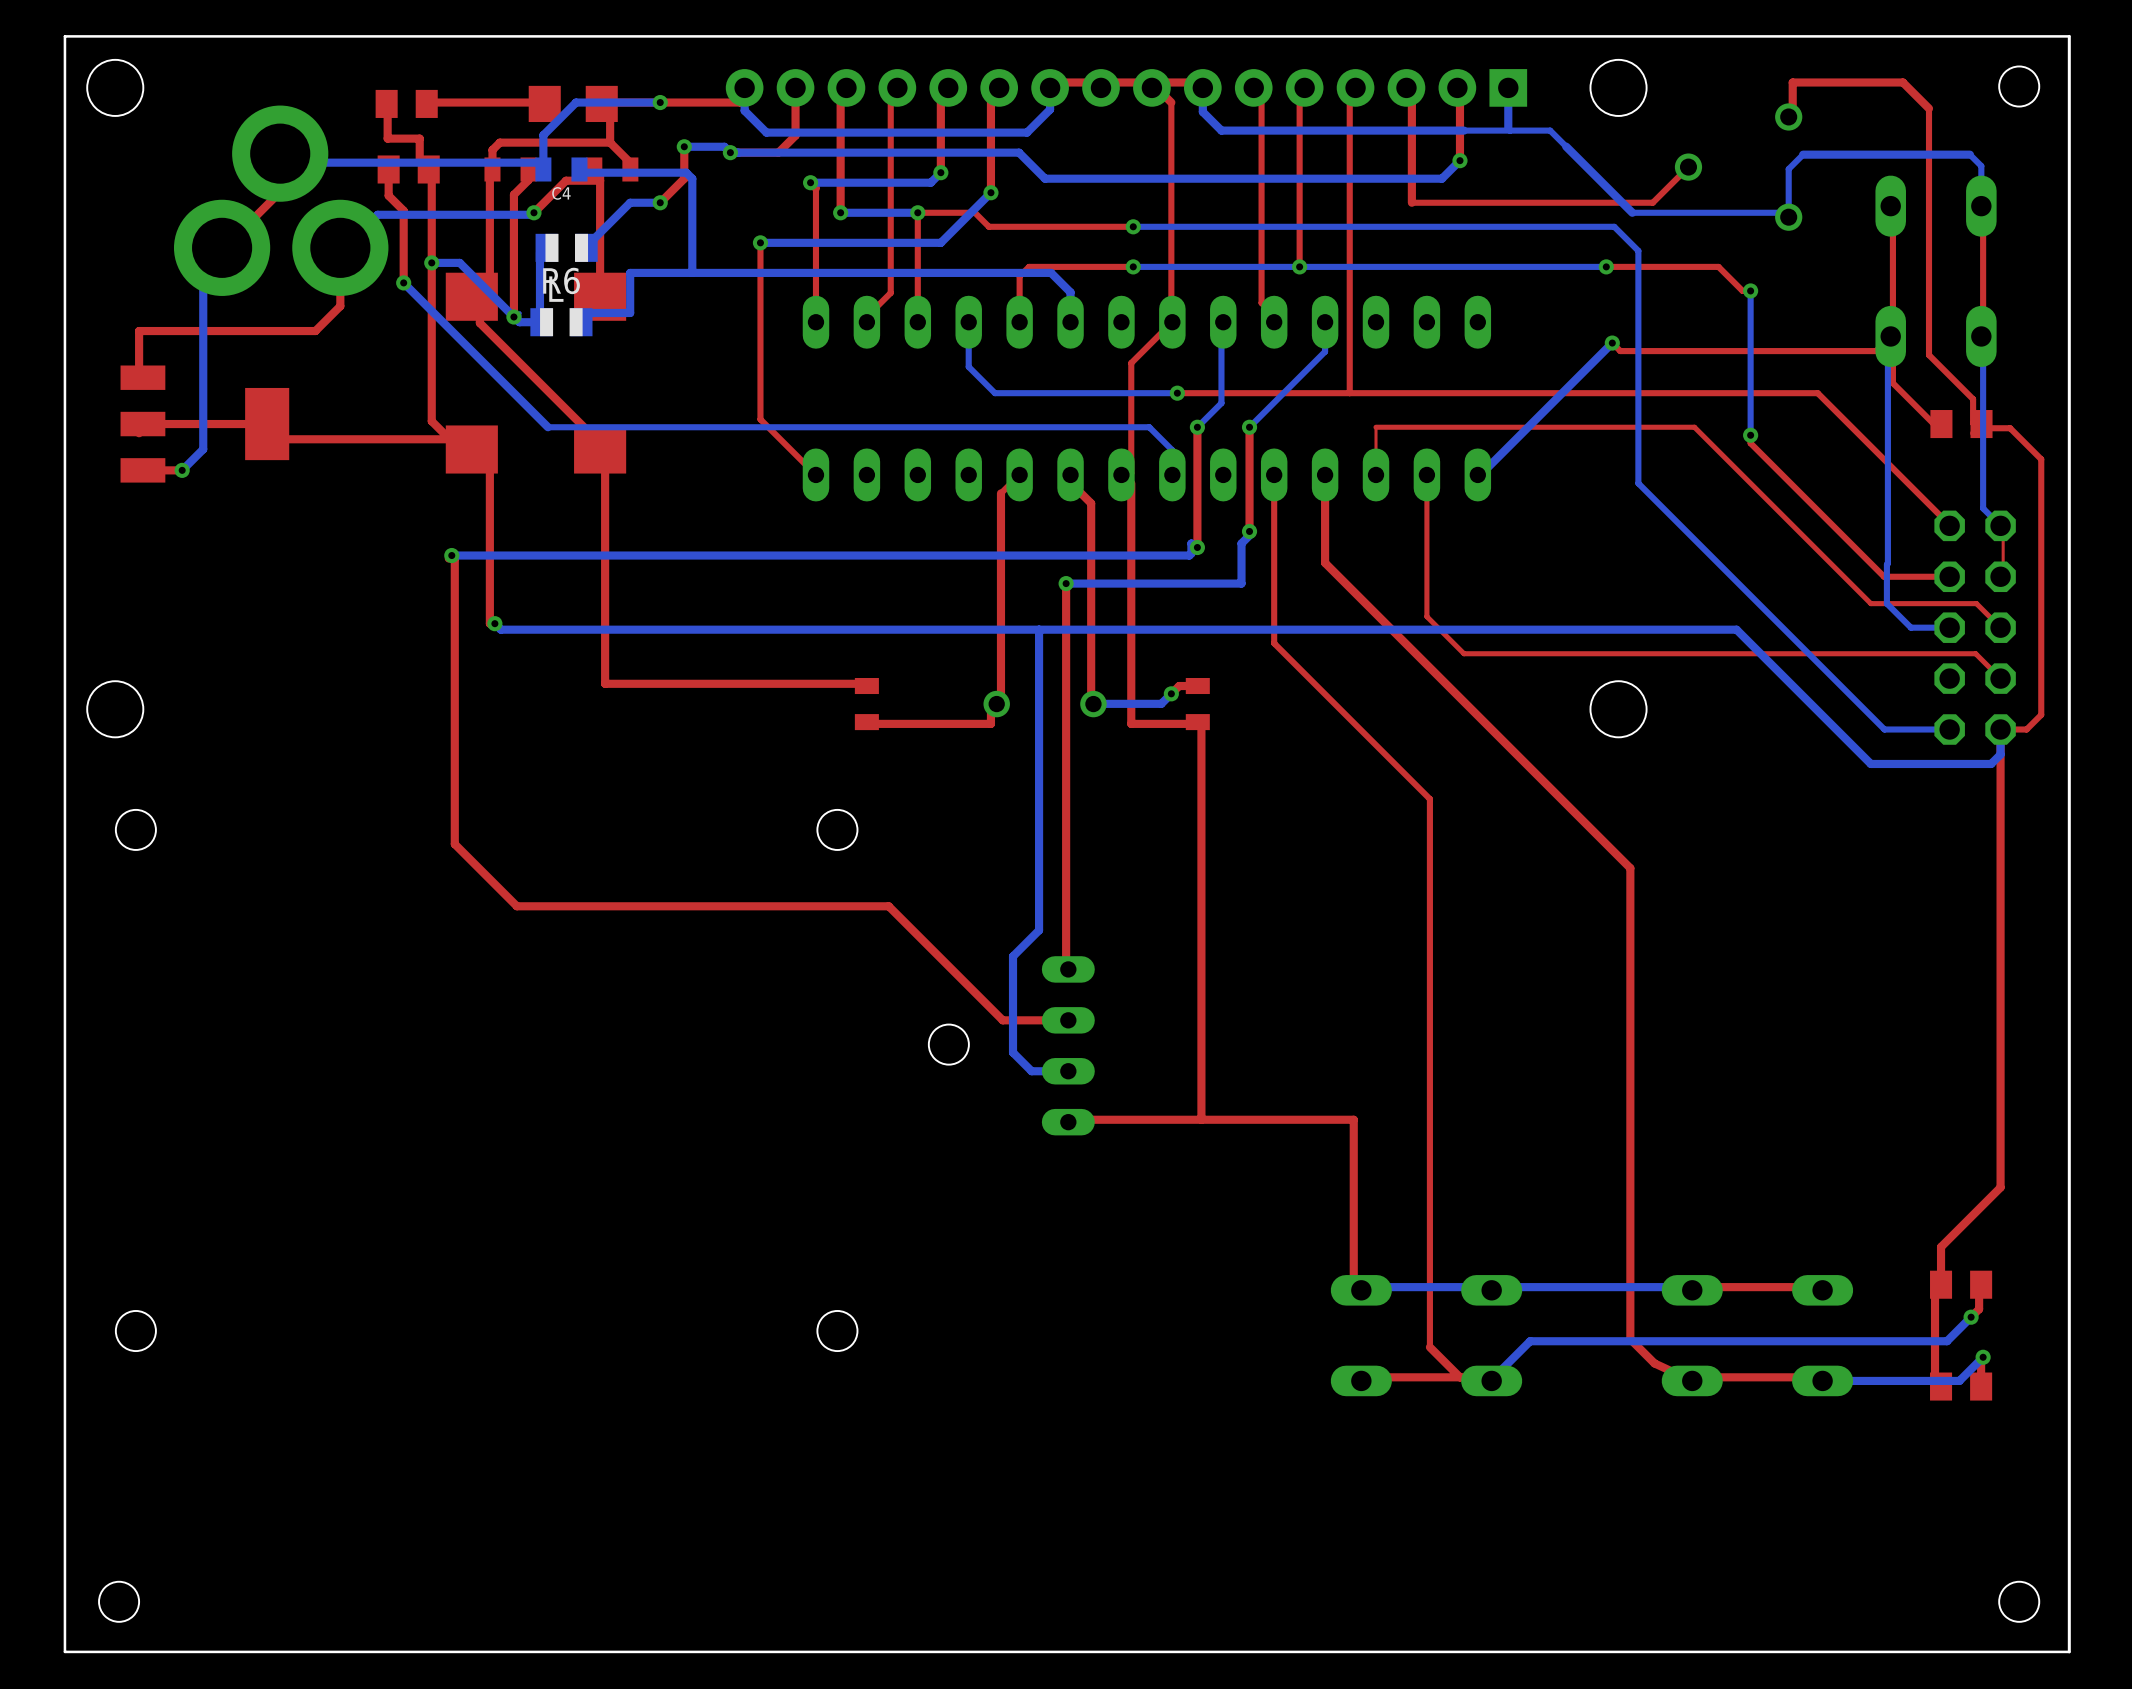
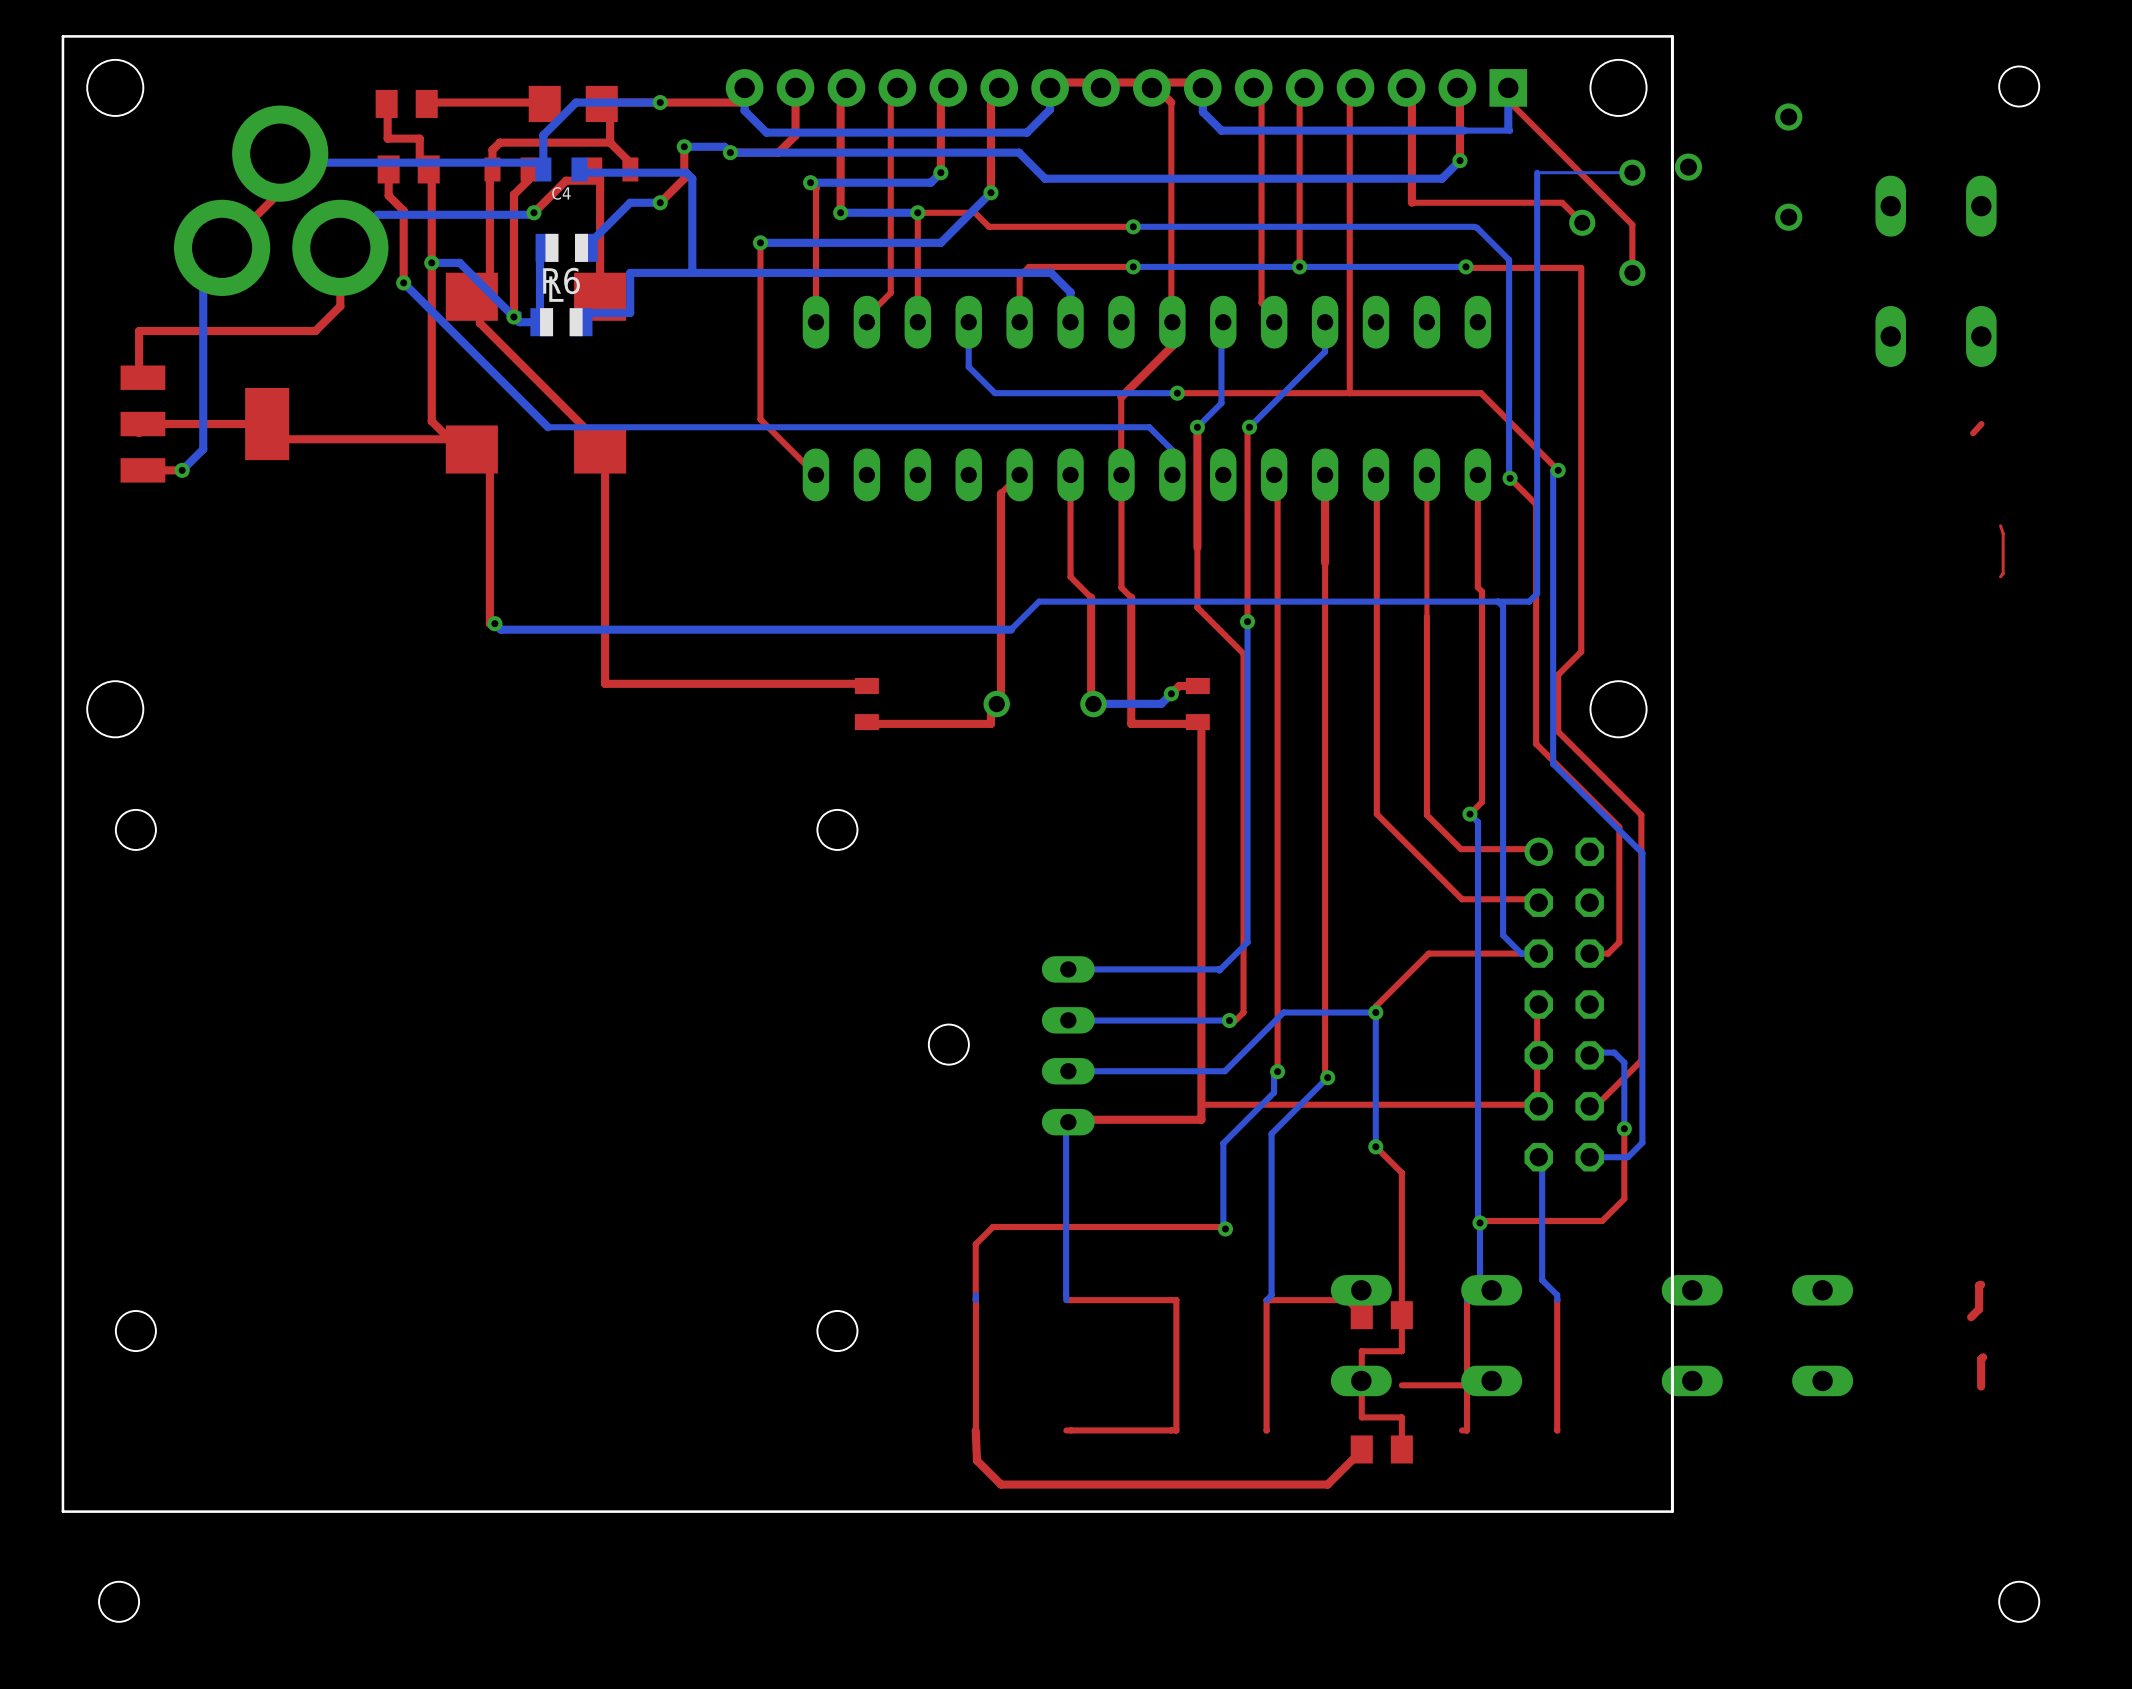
board edge: (1672, 36) (2069, 36) (2069, 1651) (64, 1651) (64, 36) -> (1672, 36) (1672, 1511) (62, 1511) (62, 36) (64, 36)
top track: none -> (1508, 87) (1508, 100) (1632, 224) (1632, 272)
top track: (1788, 116) (1792, 112) (1792, 82) (1902, 82) (1929, 108) (1929, 355) (1973, 399) (1973, 423) (1981, 424) (1983, 428) (2010, 428) (2041, 459) (2041, 714) (2026, 729) (2000, 729) -> none
bottom track: (1510, 130) (1550, 130) (1632, 212) (1782, 212) (1788, 217) (1788, 169) (1803, 154) (1969, 154) (1981, 166) (1981, 206) -> none
top track: (1688, 167) (1652, 202) (1562, 202) -> (1582, 222) (1562, 202)
top track: (1890, 206) (1892, 212) (1892, 333) (1890, 336) -> none
top track: (1981, 206) (1983, 212) (1983, 333) (1981, 336) -> none
part: none -> (1607, 222)
bottom track: (1474, 226) (1614, 226) (1638, 250) (1638, 483) (1884, 729) (1949, 729) -> (1474, 226) (1509, 259) (1510, 478)
top track: none -> (1466, 266) (1581, 267) (1581, 651) (1558, 674) (1558, 731) (1641, 814) (1641, 1060) (1595, 1106) (1589, 1106)
via: none -> (1466, 266)
top track: (1606, 266) (1718, 266) (1742, 290) (1750, 290) -> none
bottom track: (1606, 266) (1466, 266) -> none
via: (1606, 266) -> none
bottom track: (1750, 290) (1750, 435) -> none
via: (1750, 290) -> none
top track: none -> (1172, 322) (1172, 346) (1121, 397) (1121, 474)
top track: (1171, 323) (1131, 363) (1131, 473) (1121, 474) (1131, 483) (1131, 597) -> (1121, 474) (1121, 587) (1131, 597)
top track: (1890, 336) (1892, 343) (1892, 383) (1933, 423) (1941, 424) -> none
top track: (1890, 336) (1876, 351) (1620, 351) (1612, 343) -> none
bottom track: (1890, 336) (1887, 343) (1886, 603) (1910, 627) (1949, 627) -> none
bottom track: (1981, 336) (1983, 338) (1983, 508) (2000, 525) -> none
bottom track: (1612, 343) (1482, 473) (1477, 474) -> none
via: (1612, 343) -> none
top track: (1481, 393) (1817, 393) (1949, 525) -> (1481, 393) (1558, 470)
part: (1961, 424) -> none
top track: (1249, 427) (1249, 531) -> (1249, 427) (1247, 429) (1247, 621)
top track: (1750, 435) (1750, 443) (1884, 576) (1949, 576) (1948, 573) -> none
via: (1750, 435) -> none
bottom track: none -> (1558, 470) (1553, 470) (1553, 763) (1642, 853) (1642, 1142) (1627, 1157) (1589, 1157)
via: none -> (1558, 470)
top track: (1070, 474) (1071, 483) (1091, 503) (1091, 597) -> (1070, 474) (1070, 576) (1091, 597)
top track: (1274, 474) (1274, 643) (1429, 799) (1429, 1347) (1459, 1377) -> (1274, 474) (1277, 478) (1277, 1071)
top track: (1376, 474) (1376, 427) (1694, 427) (1870, 603) (1976, 603) (2000, 627) (1998, 623) -> (1376, 474) (1376, 814) (1461, 899) (1537, 899) (1538, 902)
top track: none -> (1477, 474) (1477, 587) (1482, 591) (1482, 802) (1470, 814)
top track: none -> (1510, 478) (1536, 504) (1536, 743) (1619, 827) (1619, 942) (1608, 953) (1589, 953)
via: none -> (1510, 478)
bottom track: (1249, 531) (1251, 533) (1241, 543) (1241, 583) (1066, 583) -> none
via: (1249, 531) -> none
top track: none -> (1197, 547) (1197, 607) (1243, 653) (1243, 1012) (1235, 1020) (1229, 1020)
bottom track: (1197, 547) (1191, 543) (1191, 553) (1189, 555) (451, 555) -> none
via: (1197, 547) -> none
via: (451, 555) -> none
top track: (448, 558) (451, 555) (454, 558) (454, 844) (516, 906) (888, 906) (1002, 1020) (1068, 1020) -> none
top track: (1325, 562) (1630, 868) (1630, 1339) (1654, 1363) (1692, 1380) (1694, 1377) (1814, 1377) (1822, 1380) -> (1325, 562) (1325, 1075) (1327, 1077)
top track: (1066, 583) (1066, 969) -> none
via: (1066, 583) -> none
bottom track: none -> (1498, 601) (1503, 606) (1503, 935) (1521, 953) (1538, 953)
top track: (1426, 616) (1463, 653) (1975, 653) (2000, 678) (1998, 673) -> (1426, 616) (1426, 815) (1460, 849) (1537, 849) (1538, 851)
bottom track: none -> (1247, 621) (1247, 942) (1219, 970) (1068, 969)
via: none -> (1247, 621)
part: (1975, 627) -> none
bottom track: (1011, 629) (1736, 629) (1870, 763) (1991, 763) (2000, 754) (2000, 729) (1998, 728) -> (1011, 629) (1039, 601) (1529, 601) (1537, 593) (1537, 172) (1632, 172)
bottom track: (1039, 629) (1039, 930) (1013, 956) (1013, 1052) (1031, 1071) (1068, 1071) -> (1375, 1146) (1375, 1012) (1283, 1012) (1224, 1071) (1068, 1071)
top track: (2000, 729) (2000, 1187) (1941, 1247) (1941, 1284) -> none
bottom track: none -> (1470, 814) (1478, 822) (1478, 1220) (1480, 1222) (1480, 1286) (1466, 1300)
via: none -> (1470, 814)
top track: none -> (1538, 953) (1428, 953) (1375, 1006) (1375, 1012)
top track: none -> (1538, 1004) (1537, 1004) (1537, 1054) (1538, 1055) (1537, 1104) (1201, 1104)
part: none -> (1564, 1004)
via: none -> (1375, 1012)
bottom track: none -> (1229, 1020) (1068, 1020)
via: none -> (1229, 1020)
bottom track: none -> (1589, 1055) (1592, 1052) (1614, 1052) (1624, 1062) (1624, 1128)
bottom track: none -> (1277, 1071) (1274, 1075) (1274, 1092) (1223, 1143) (1223, 1226) (1225, 1228)
via: none -> (1277, 1071)
bottom track: none -> (1327, 1077) (1271, 1133) (1271, 1295) (1266, 1300)
via: none -> (1327, 1077)
top track: (1201, 1119) (1353, 1119) (1353, 1287) (1361, 1290) -> none
bottom track: none -> (1068, 1122) (1066, 1124) (1066, 1300)
top track: none -> (1624, 1128) (1624, 1198) (1602, 1220) (1482, 1220) (1480, 1222)
via: none -> (1624, 1128)
top track: none -> (1373, 1144) (1401, 1172) (1401, 1351) (1361, 1351) (1361, 1417) (1401, 1417) (1401, 1449)
via: none -> (1375, 1146)
bottom track: none -> (1538, 1157) (1542, 1159) (1542, 1280) (1557, 1295) (1557, 1300)
via: none -> (1480, 1222)
top track: none -> (1225, 1228) (1223, 1226) (992, 1226) (975, 1244) (975, 1300)
via: none -> (1225, 1228)
top track: (1941, 1284) (1935, 1287) (1935, 1377) (1941, 1386) -> none
part: (1961, 1284) -> none
bottom track: (1692, 1290) (1684, 1287) (1494, 1287) (1491, 1290) (1484, 1287) (1363, 1287) (1361, 1290) -> none
top track: (1822, 1290) (1814, 1287) (1694, 1287) (1692, 1290) -> none
bottom track: none -> (975, 1295) (975, 1300)
top track: none -> (975, 1300) (975, 1430)
top track: none -> (1176, 1300) (1176, 1430)
top track: none -> (1176, 1300) (1066, 1300)
top track: none -> (1266, 1300) (1346, 1300) (1361, 1315)
top track: none -> (1266, 1300) (1266, 1430)
top track: none -> (1467, 1300) (1467, 1430)
top track: none -> (1557, 1300) (1557, 1430)
part: none -> (1381, 1315)
bottom track: (1971, 1317) (1947, 1341) (1530, 1341) (1491, 1380) -> none
via: (1971, 1317) -> none
bottom track: (1983, 1357) (1959, 1380) (1822, 1380) -> none
via: (1983, 1357) -> none
top track: (1491, 1380) (1484, 1377) (1363, 1377) (1361, 1380) -> none
top track: none -> (1467, 1385) (1401, 1385)
part: (1961, 1386) -> none
top track: none -> (975, 1430) (977, 1460) (1000, 1484) (1327, 1484) (1361, 1449)
top track: none -> (1176, 1430) (1066, 1430)
top track: none -> (1466, 1430) (1461, 1430)
part: none -> (1381, 1449)

